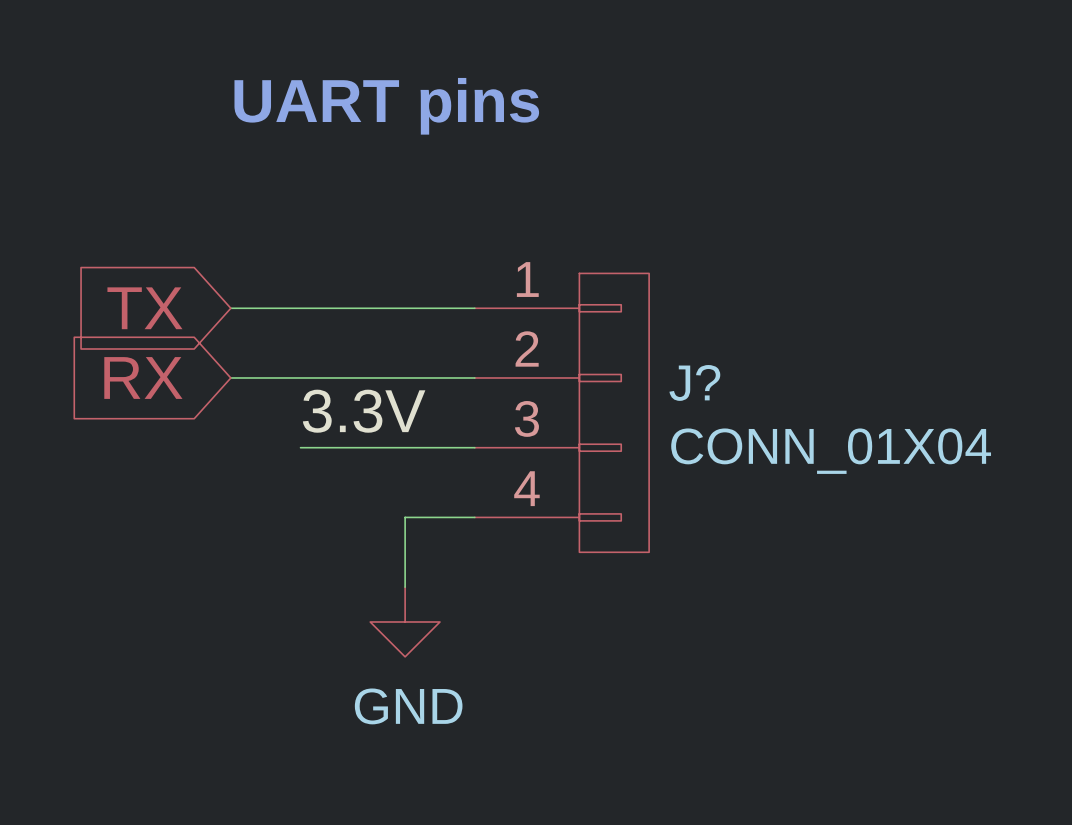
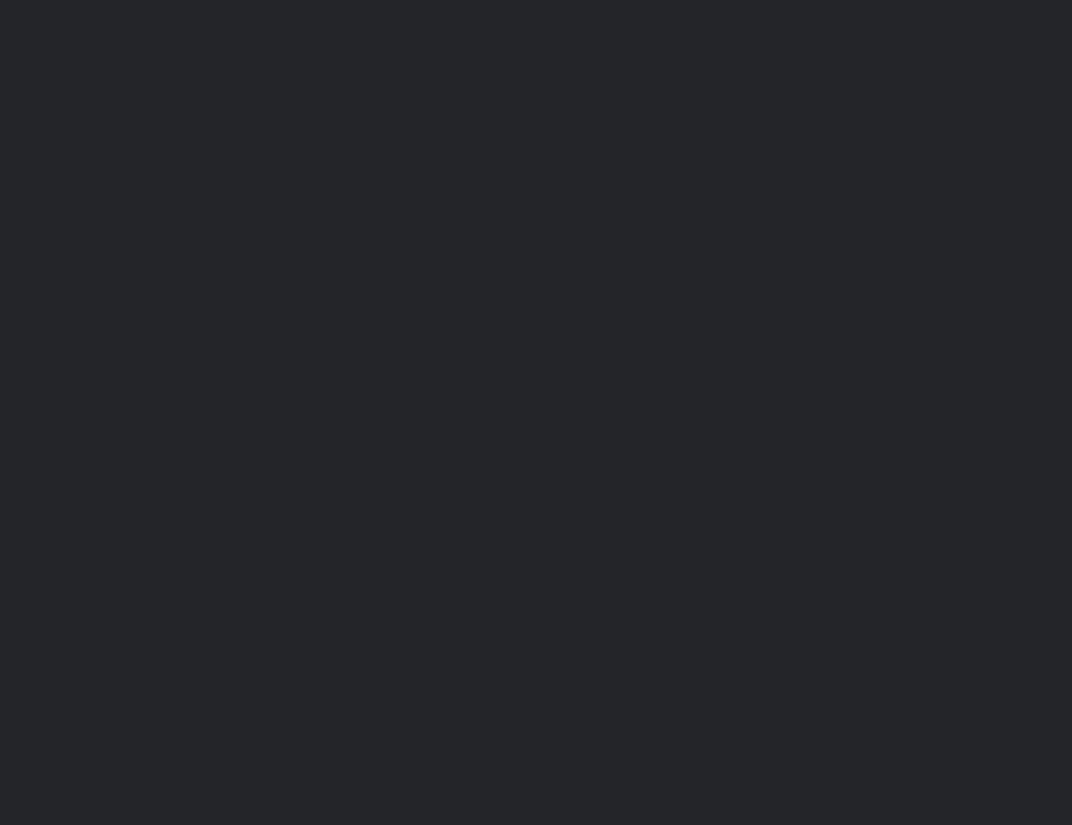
text: UART pins (386, 106) -> none
global label: TX (144, 308) -> none
wire: (230, 308) (474, 308) -> none
global label: RX (143, 377) -> none
wire: (230, 377) (474, 377) -> none
label: 3.3V (364, 411) -> none
J?: CONN_01X04 (561, 412) -> none
wire: (300, 447) (474, 447) -> none
wire: (474, 517) (405, 517) (405, 587) -> none
power symbol: GND (405, 621) -> none

